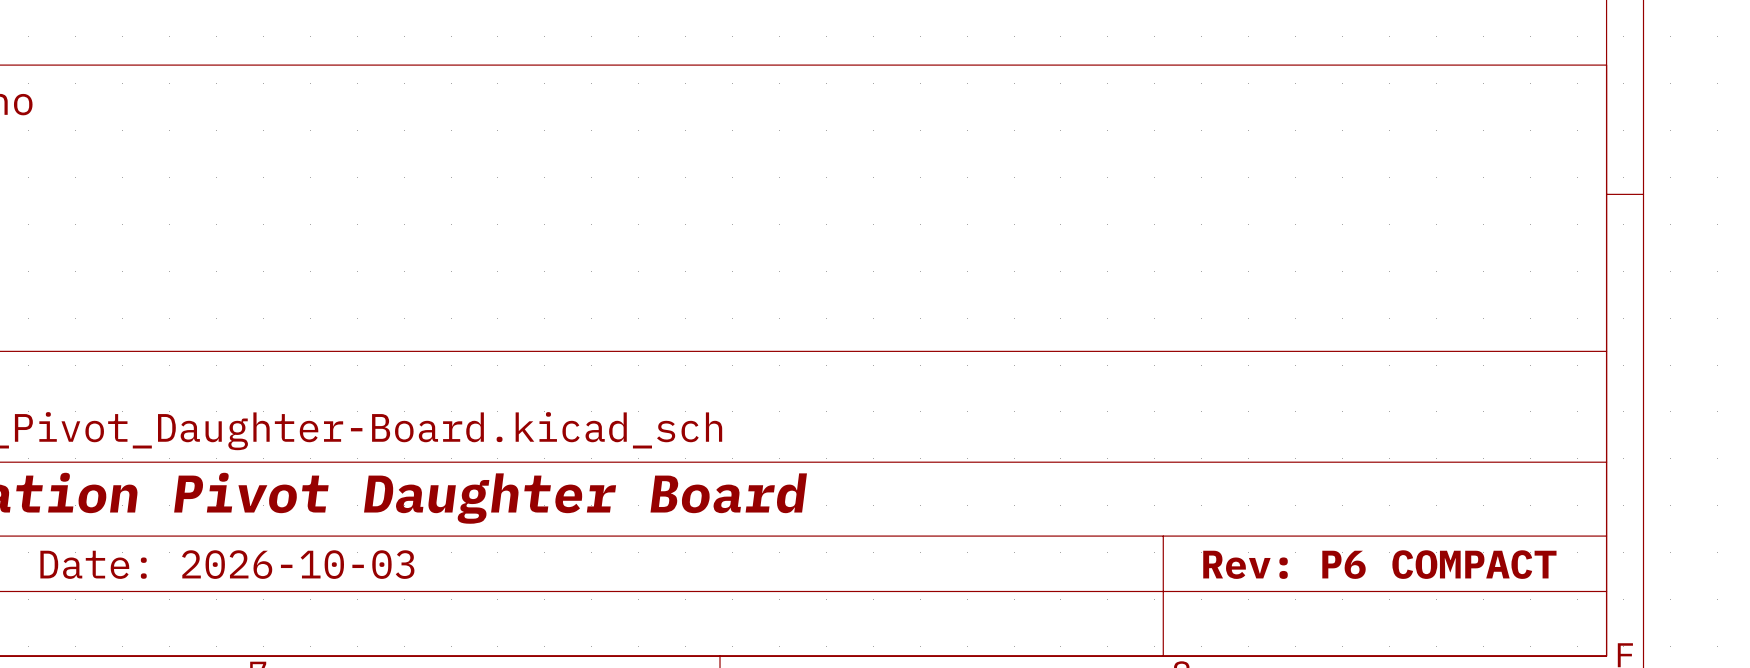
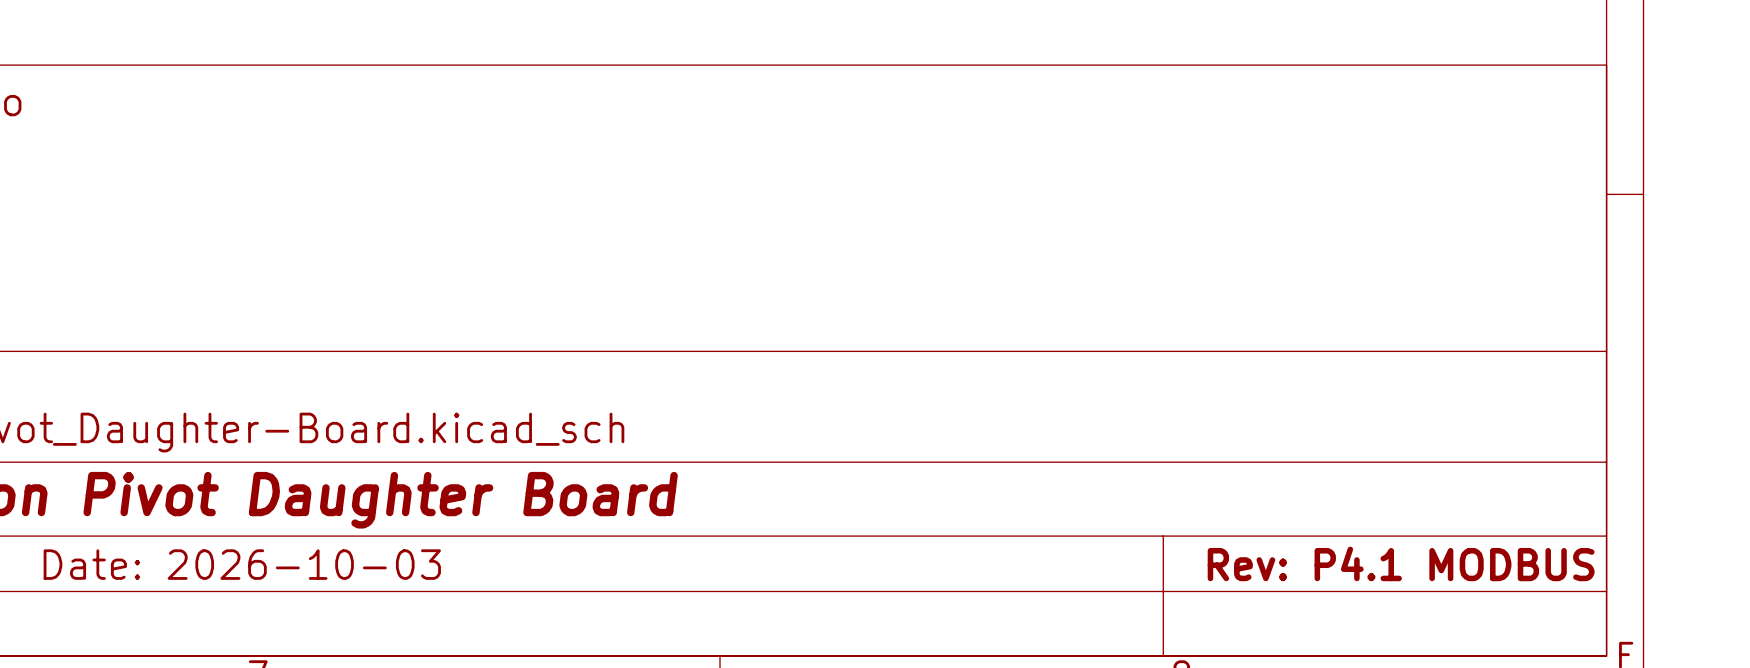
title block: Rev: P6 COMPACT (1379, 564) -> Rev: P4.1 MODBUS (1401, 563)

